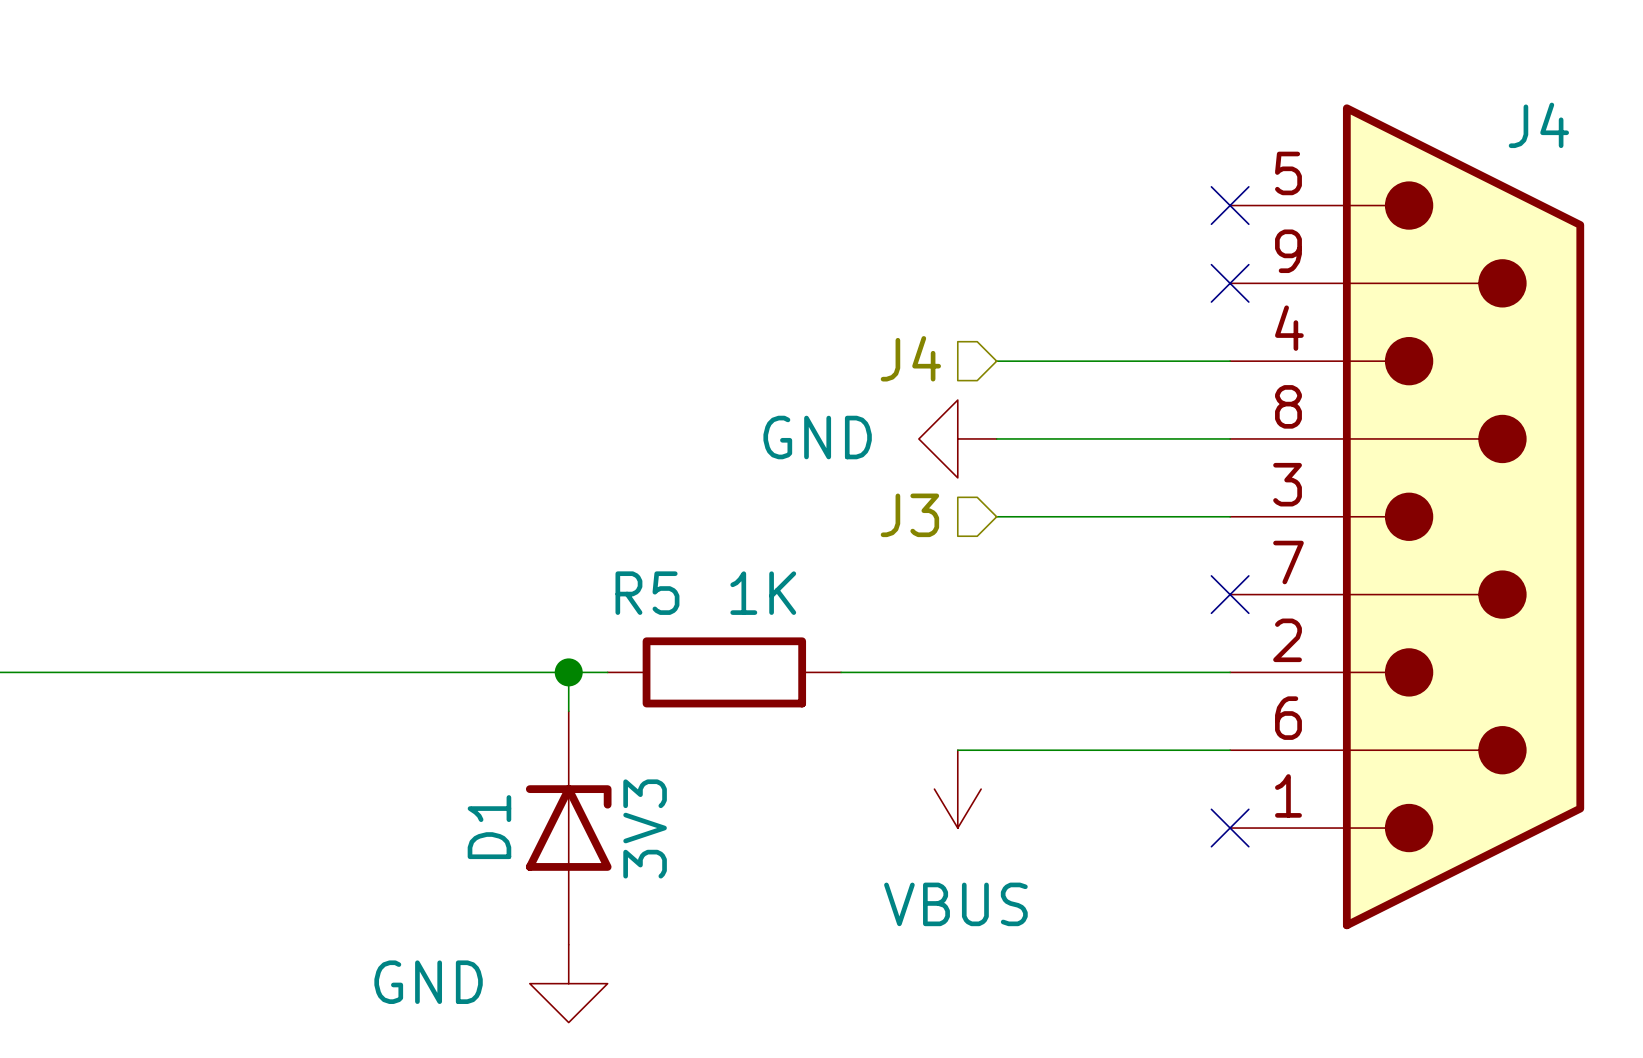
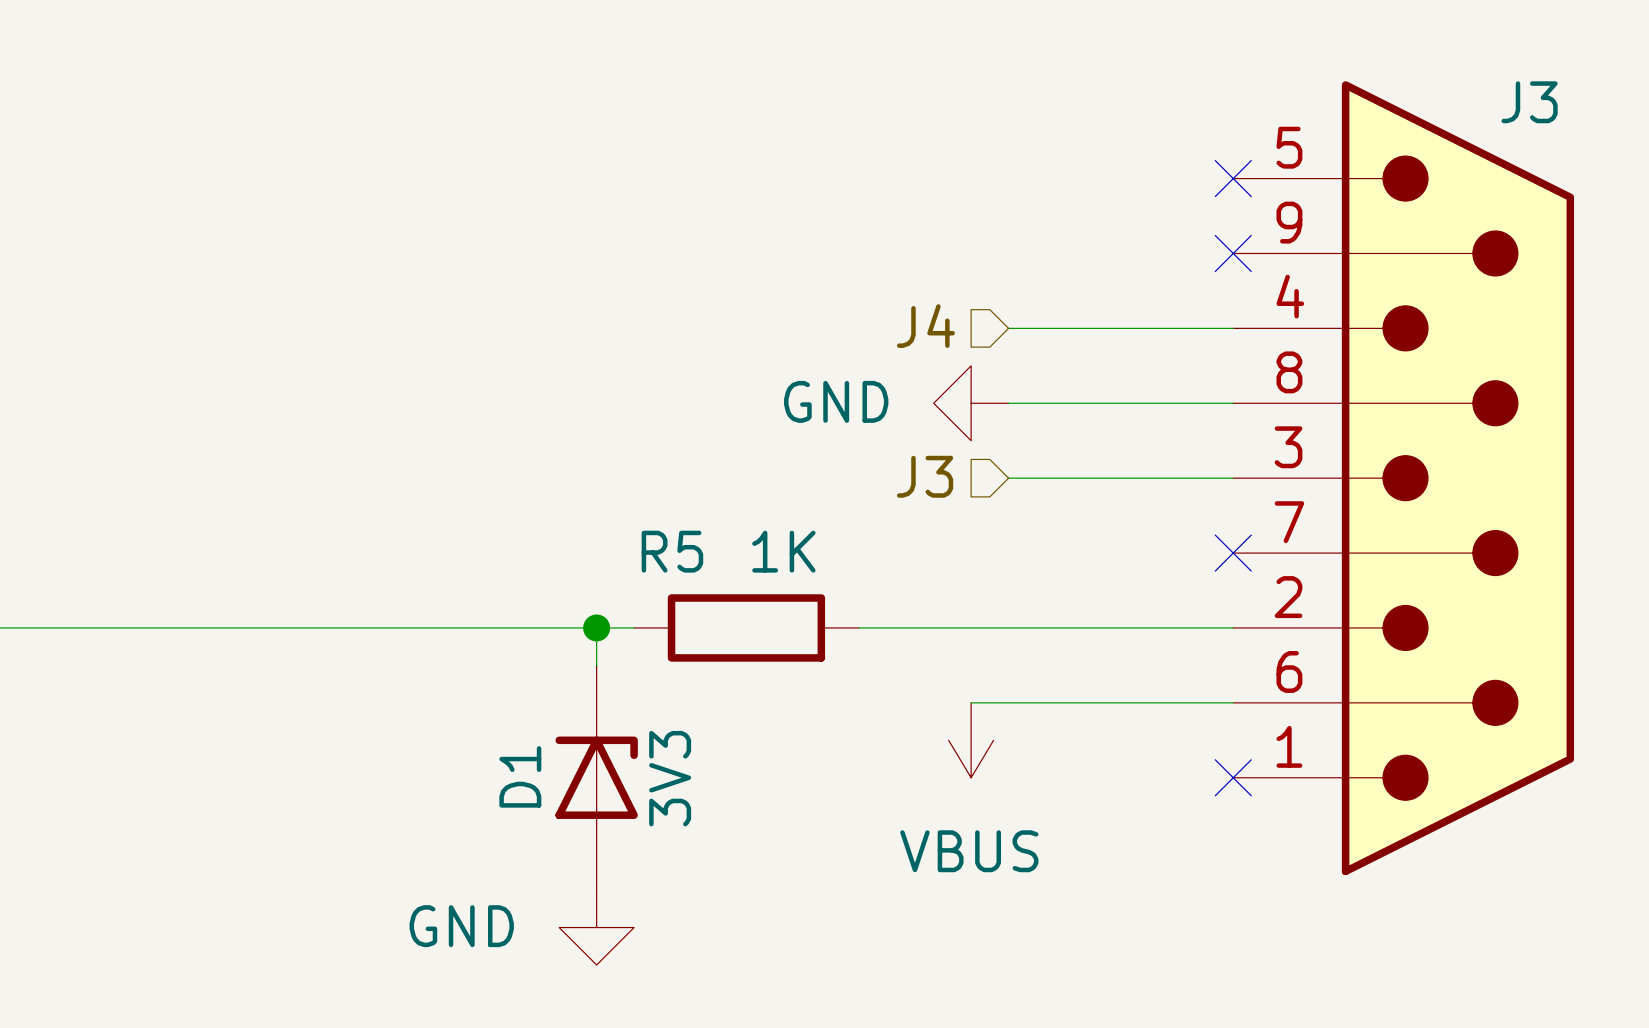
J4 name: J4 (1538, 125) -> J3 (1529, 102)

